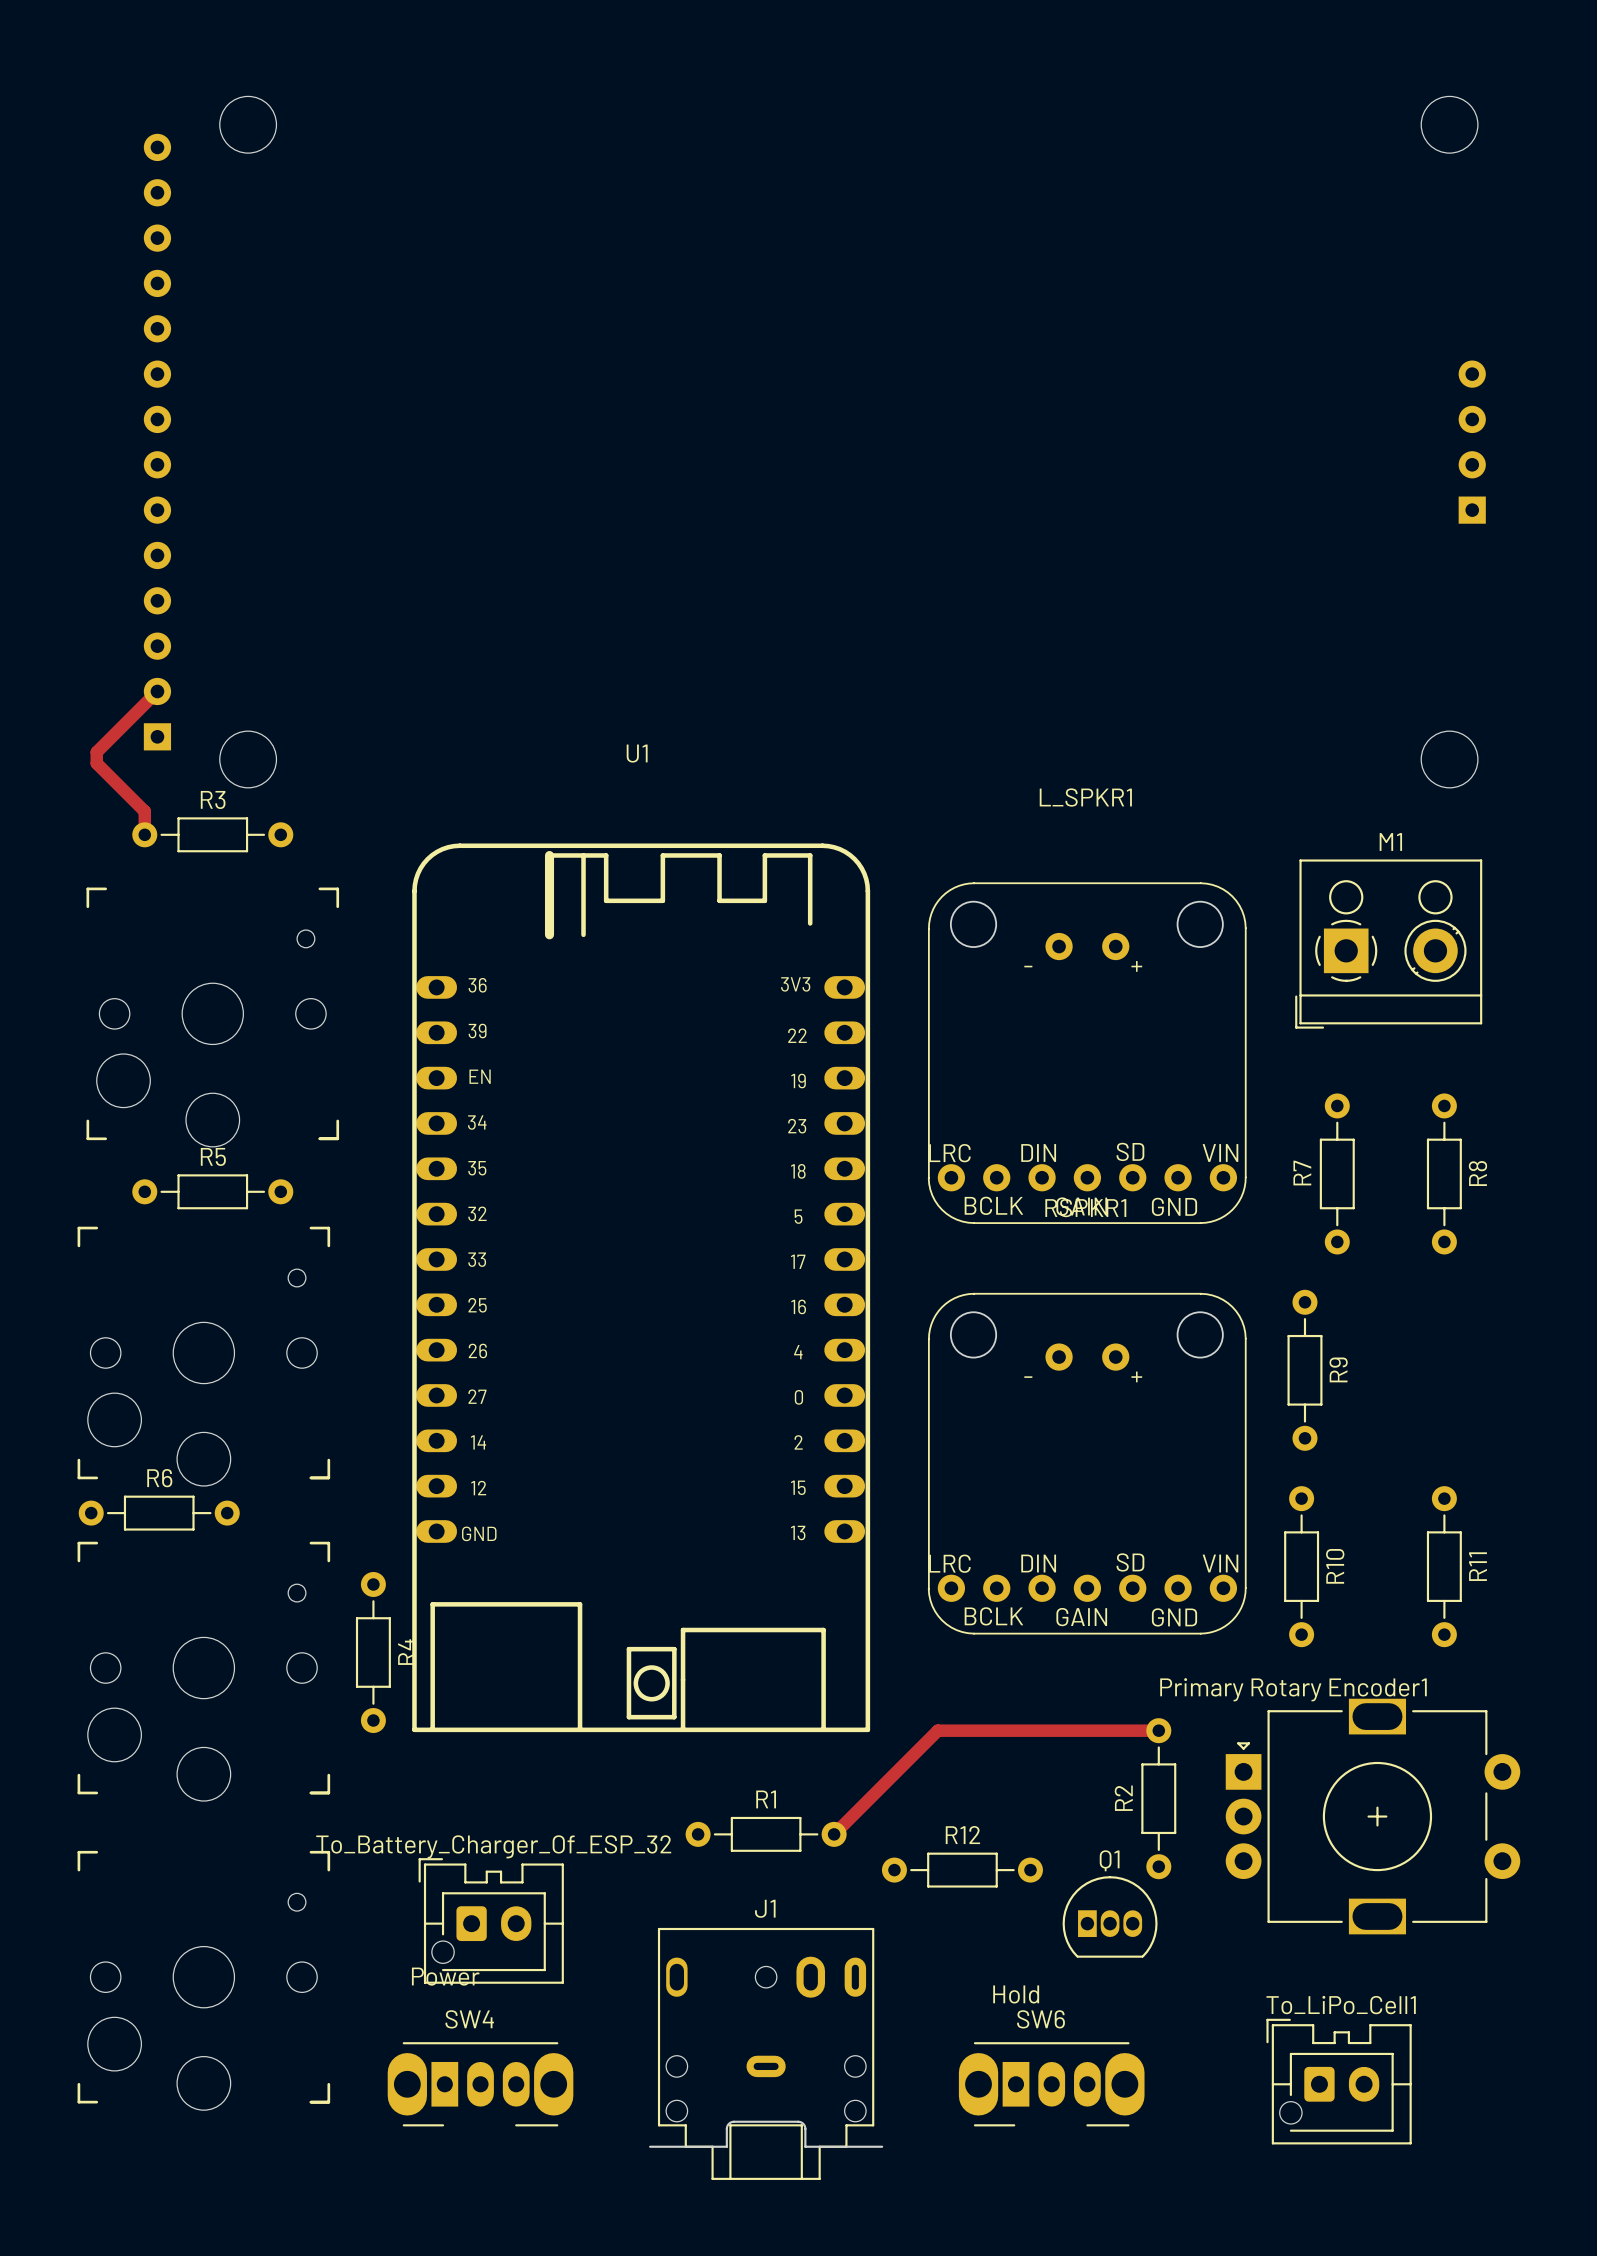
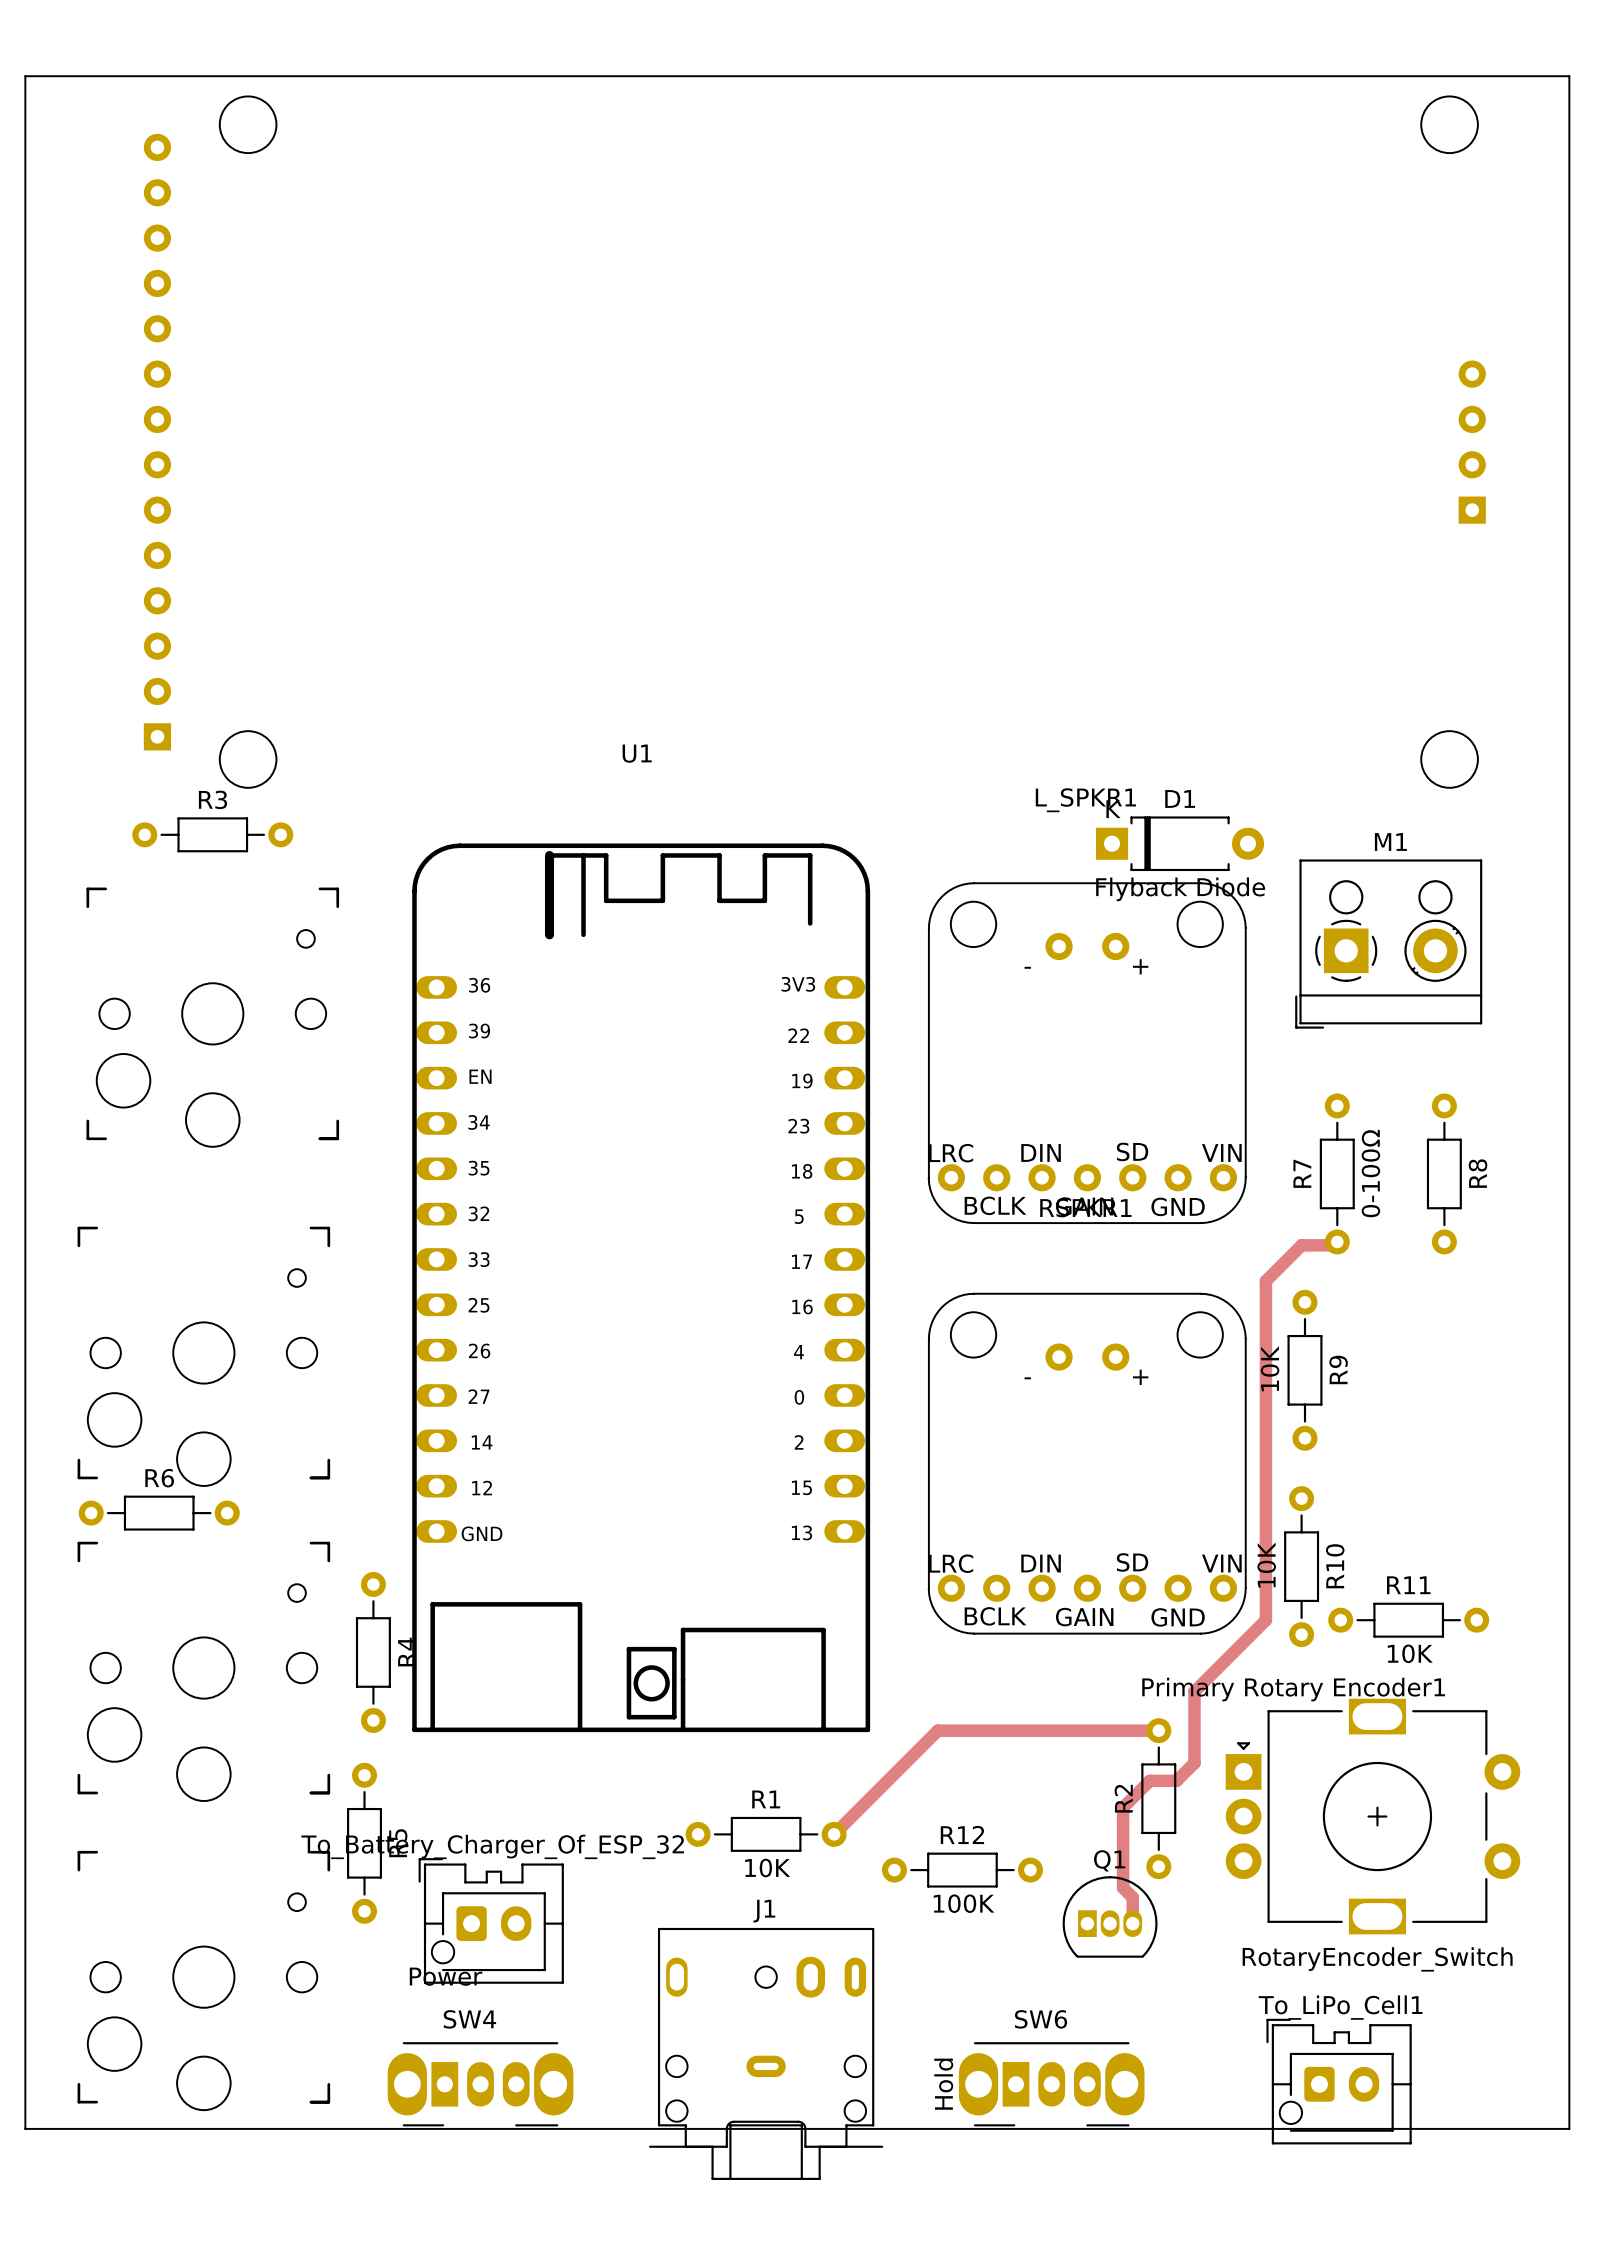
board edge: none -> (25, 76) (1569, 76) (1569, 2128) (25, 2128) (25, 76)
track: (157, 691) (96, 752) (96, 763) (144, 811) (144, 834) -> none
D1: none -> Flyback Diode (1180, 843)
R7 value: none -> 0-100Ω (1370, 1173)
R5 rotation: 0° (212, 1191) -> 90° clockwise (364, 1843)
R5 position: (212, 1191) -> (364, 1843)
track: none -> (1337, 1241) (1333, 1245) (1301, 1245) (1265, 1281) (1265, 1620) (1194, 1691) (1194, 1762) (1176, 1780) (1149, 1780) (1123, 1807) (1123, 1887) (1132, 1897) (1132, 1923)
R9 value: none -> 10K (1270, 1368)
R10 value: none -> 10K (1266, 1565)
R11 rotation: 0° (1444, 1566) -> 90° clockwise (1408, 1620)
R11 name position: R11 (1478, 1566) -> R11 (1408, 1585)
R11 value: none -> 10K (1410, 1653)
R1 value: none -> 10K (767, 1868)
R12 value: none -> 100K (964, 1903)
Primary Rotary Encoder1 value: none -> RotaryEncoder_Switch (1377, 1959)
SW6 value rotation: 0° (1016, 1994) -> 90° counterclockwise (943, 2084)
SW6 value position: Hold (1016, 1994) -> Hold (943, 2084)

